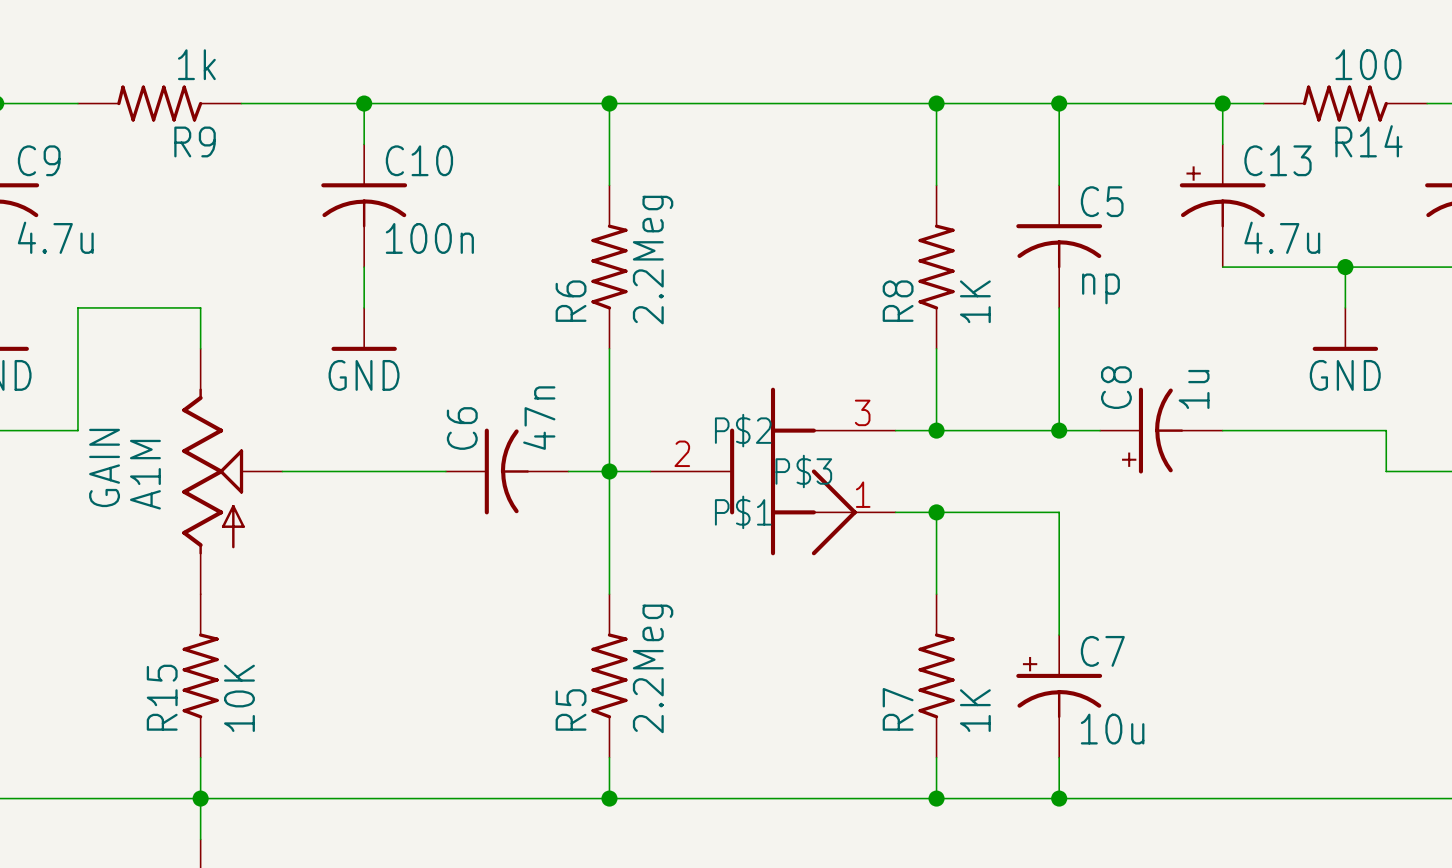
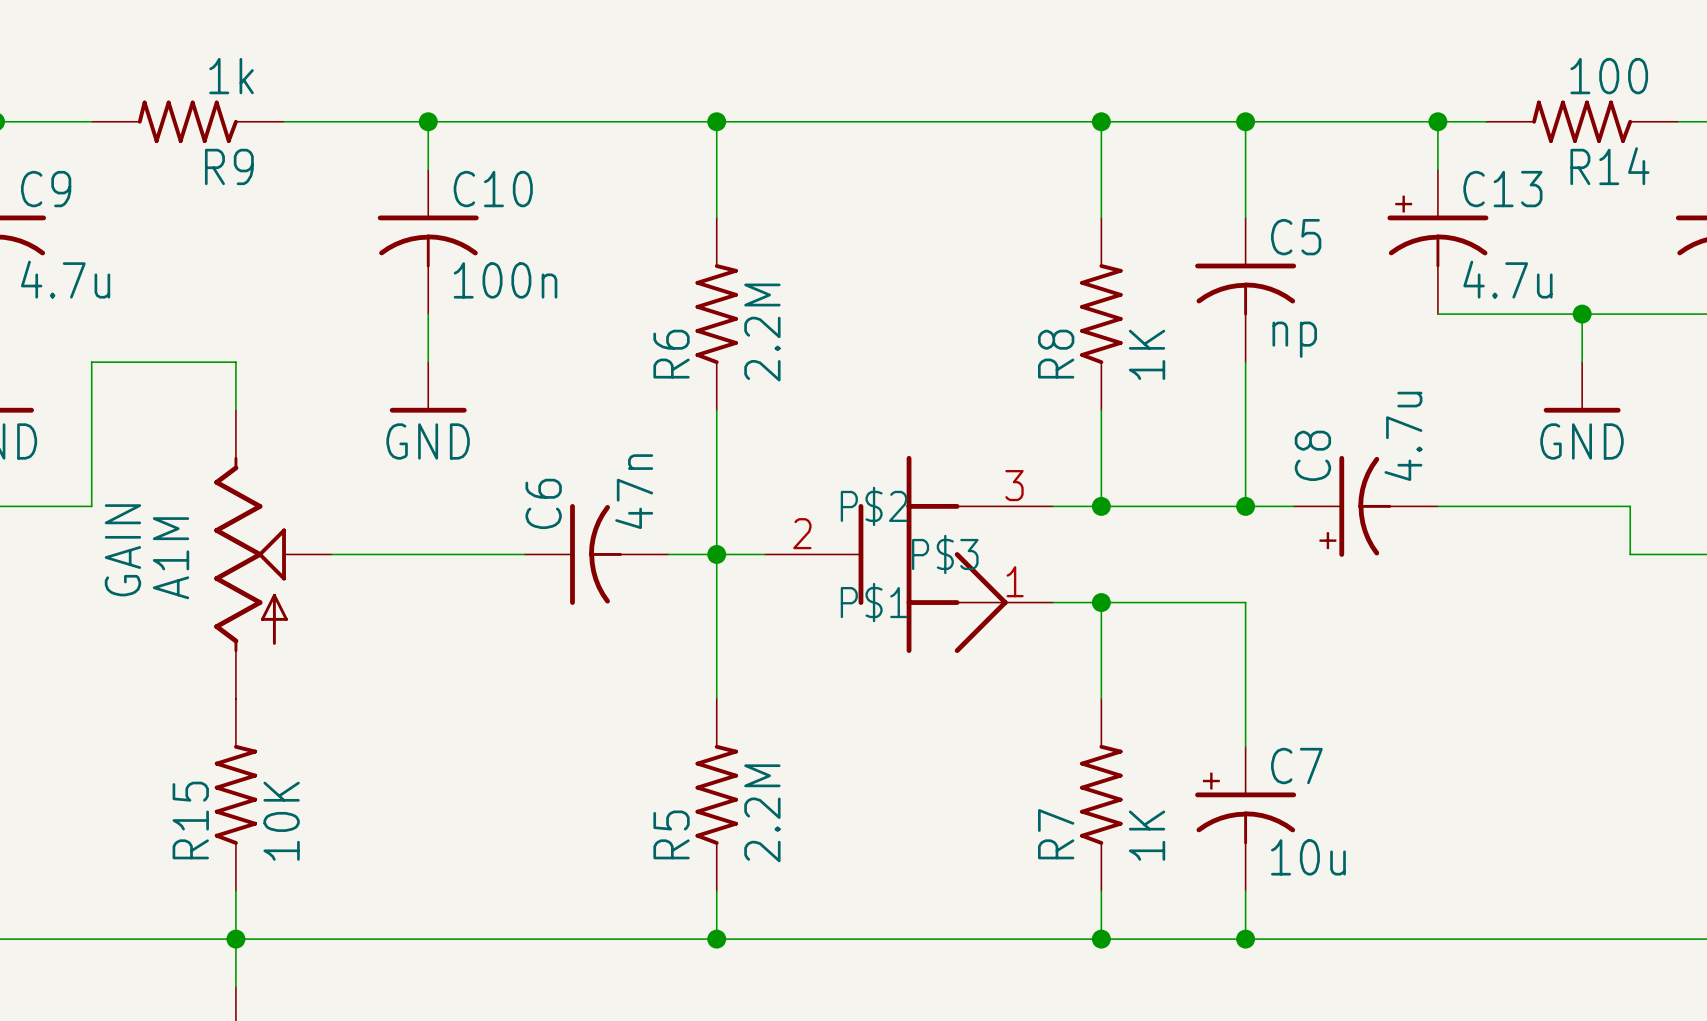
R6 value: 2.2Meg (653, 260) -> 2.2M (762, 332)
C8 value: 1u (1194, 389) -> 4.7u (1403, 436)
R5 value: 2.2Meg (653, 668) -> 2.2M (762, 813)

